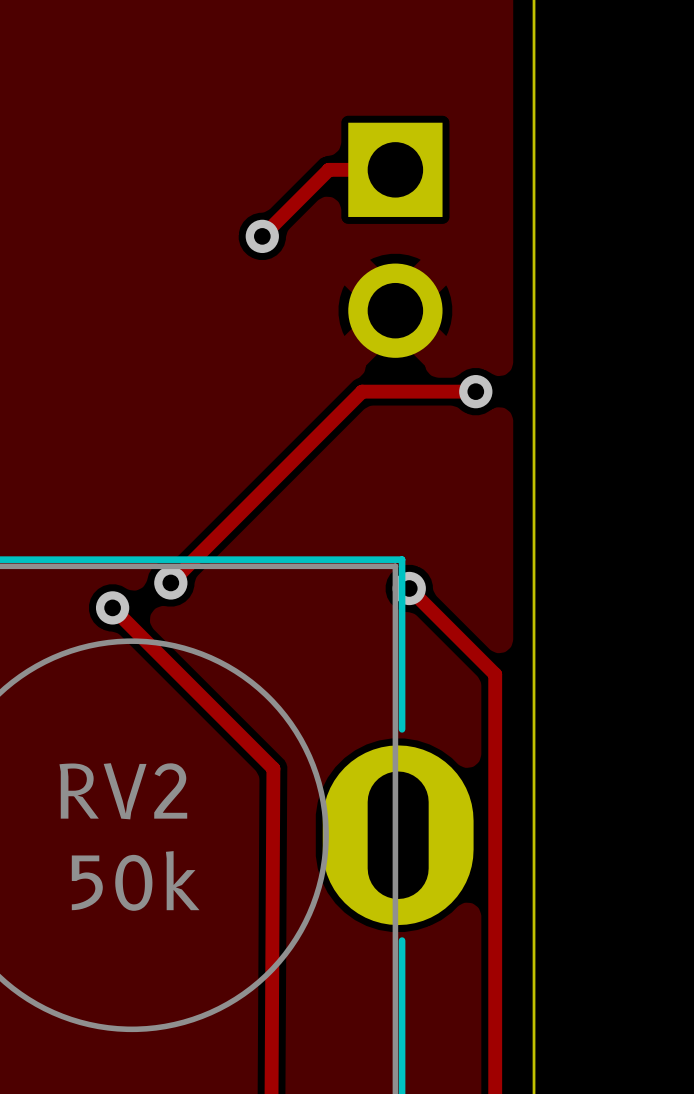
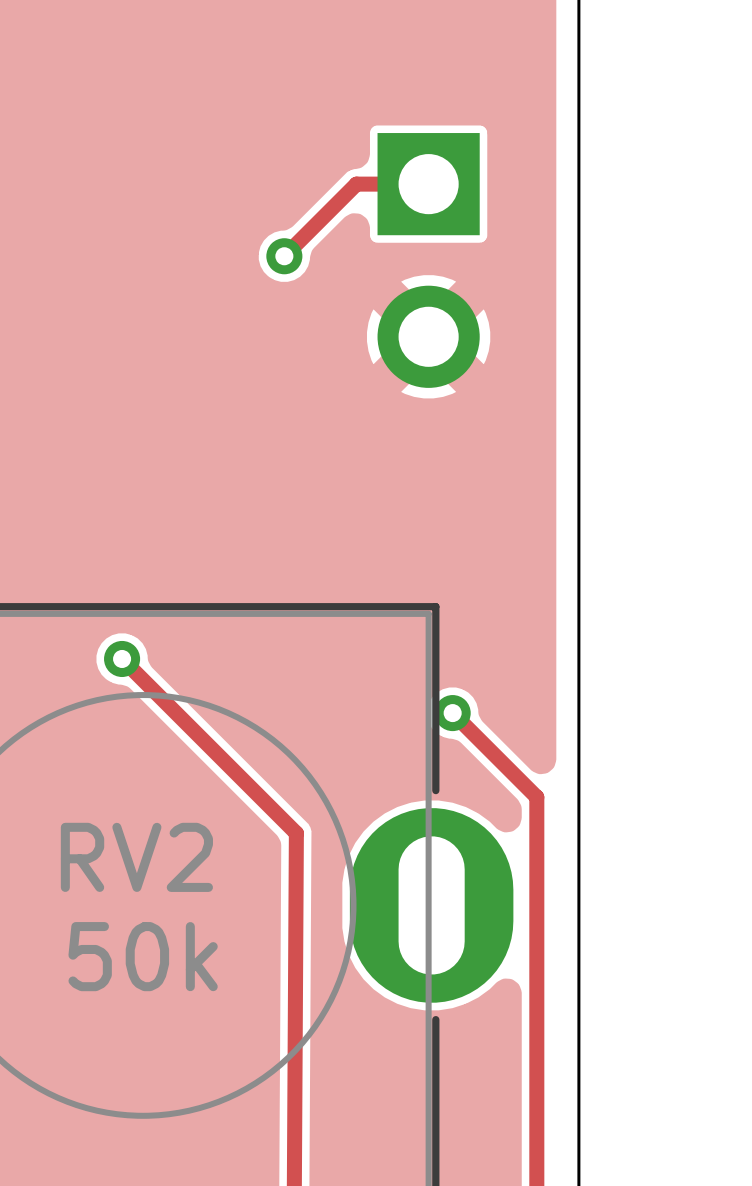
track: (475, 391) (362, 391) (170, 582) -> none
via: (475, 391) -> none
via: (170, 582) -> none
track: (409, 588) (495, 674) (495, 735) -> (452, 713) (536, 797)
via position: (409, 588) -> (452, 713)

